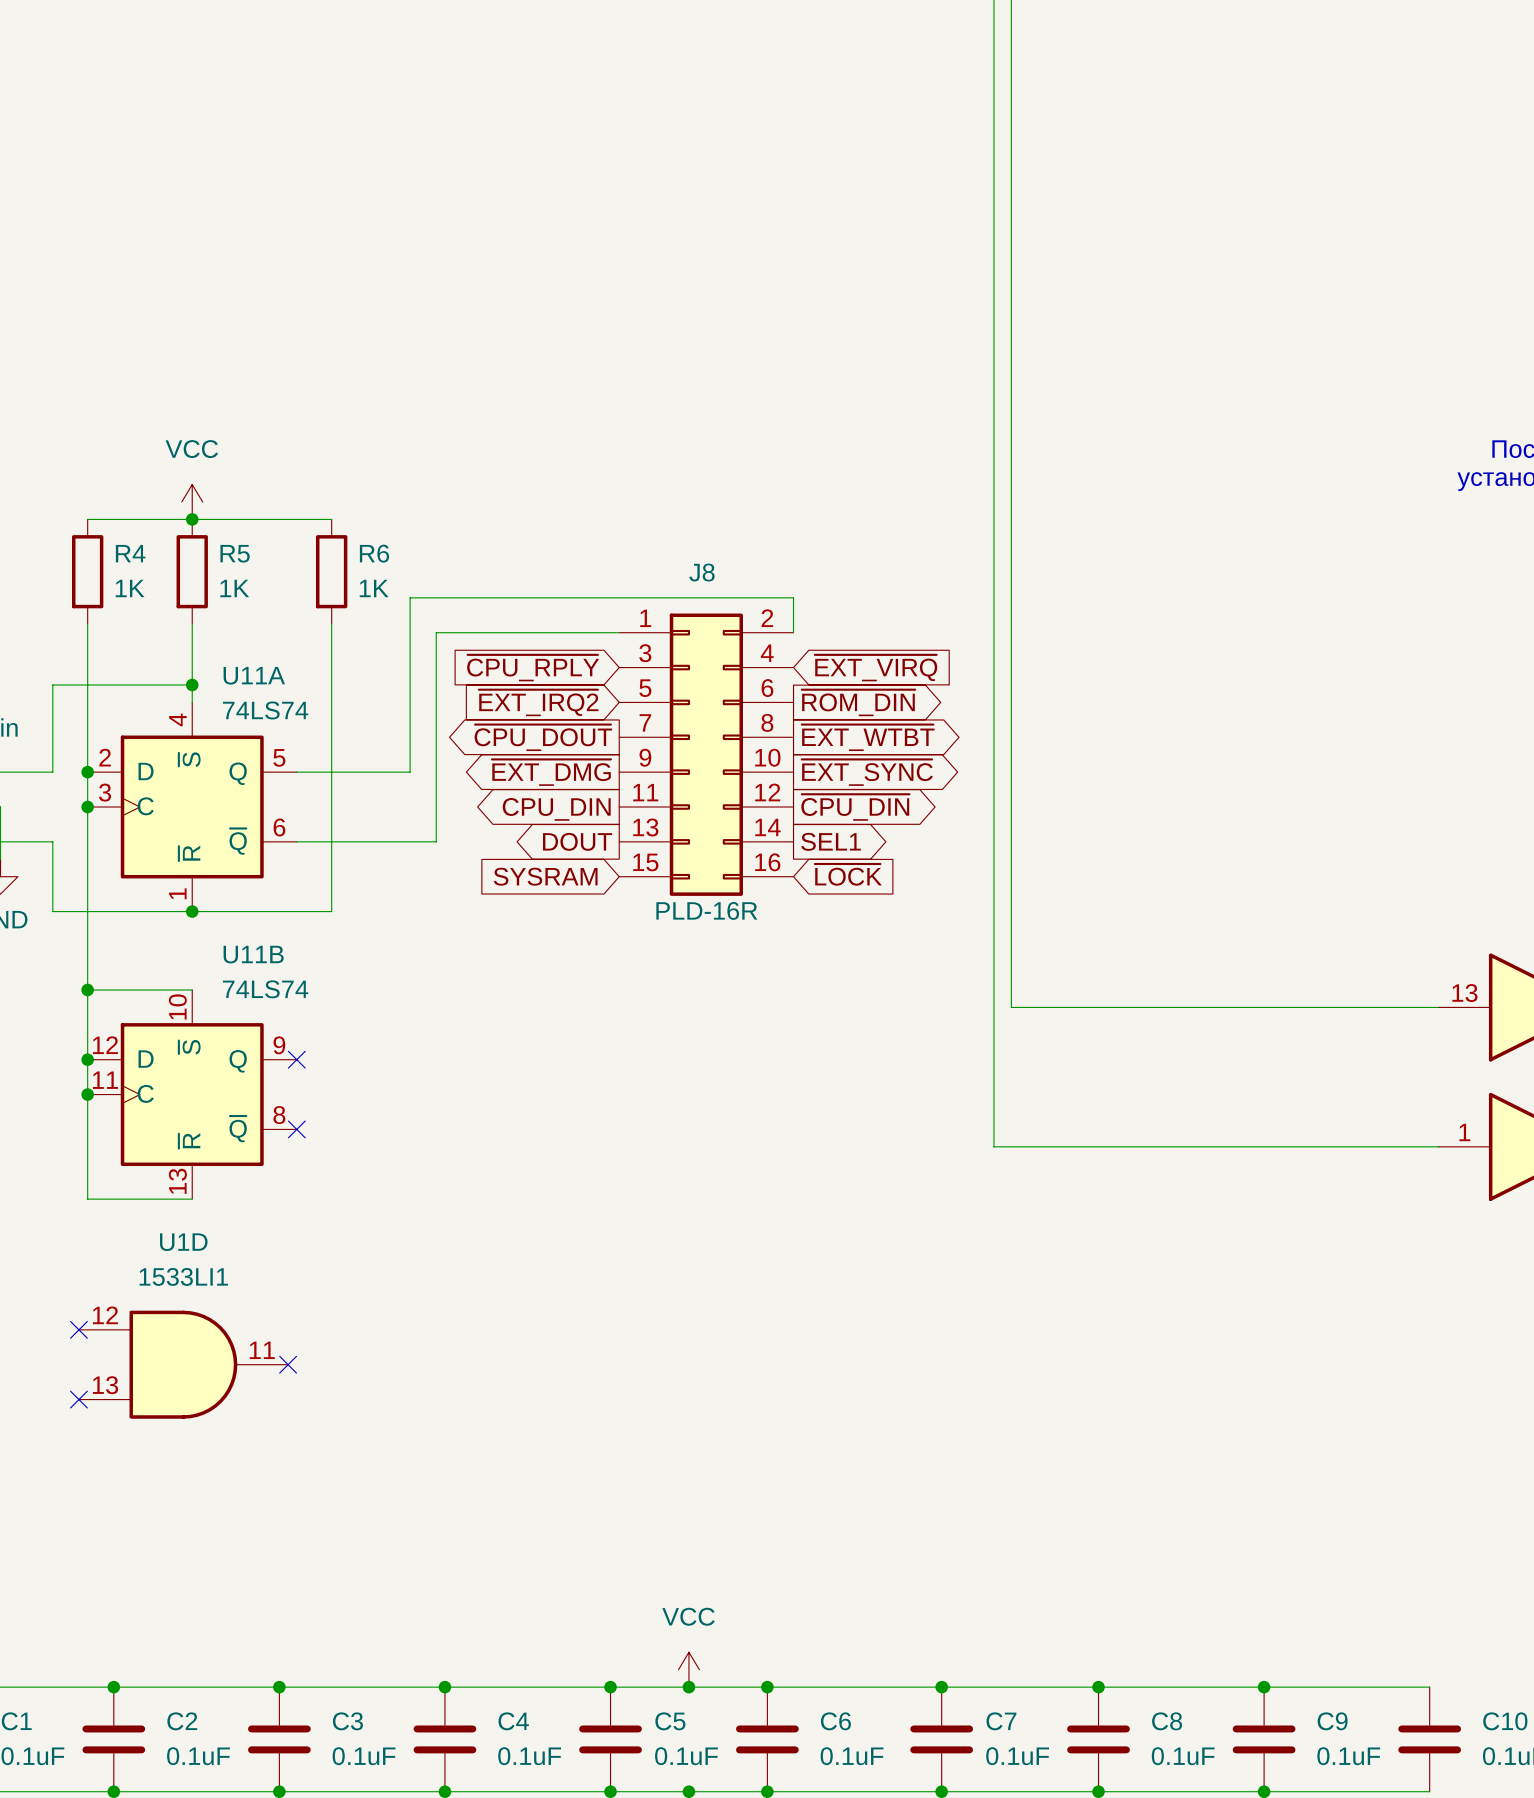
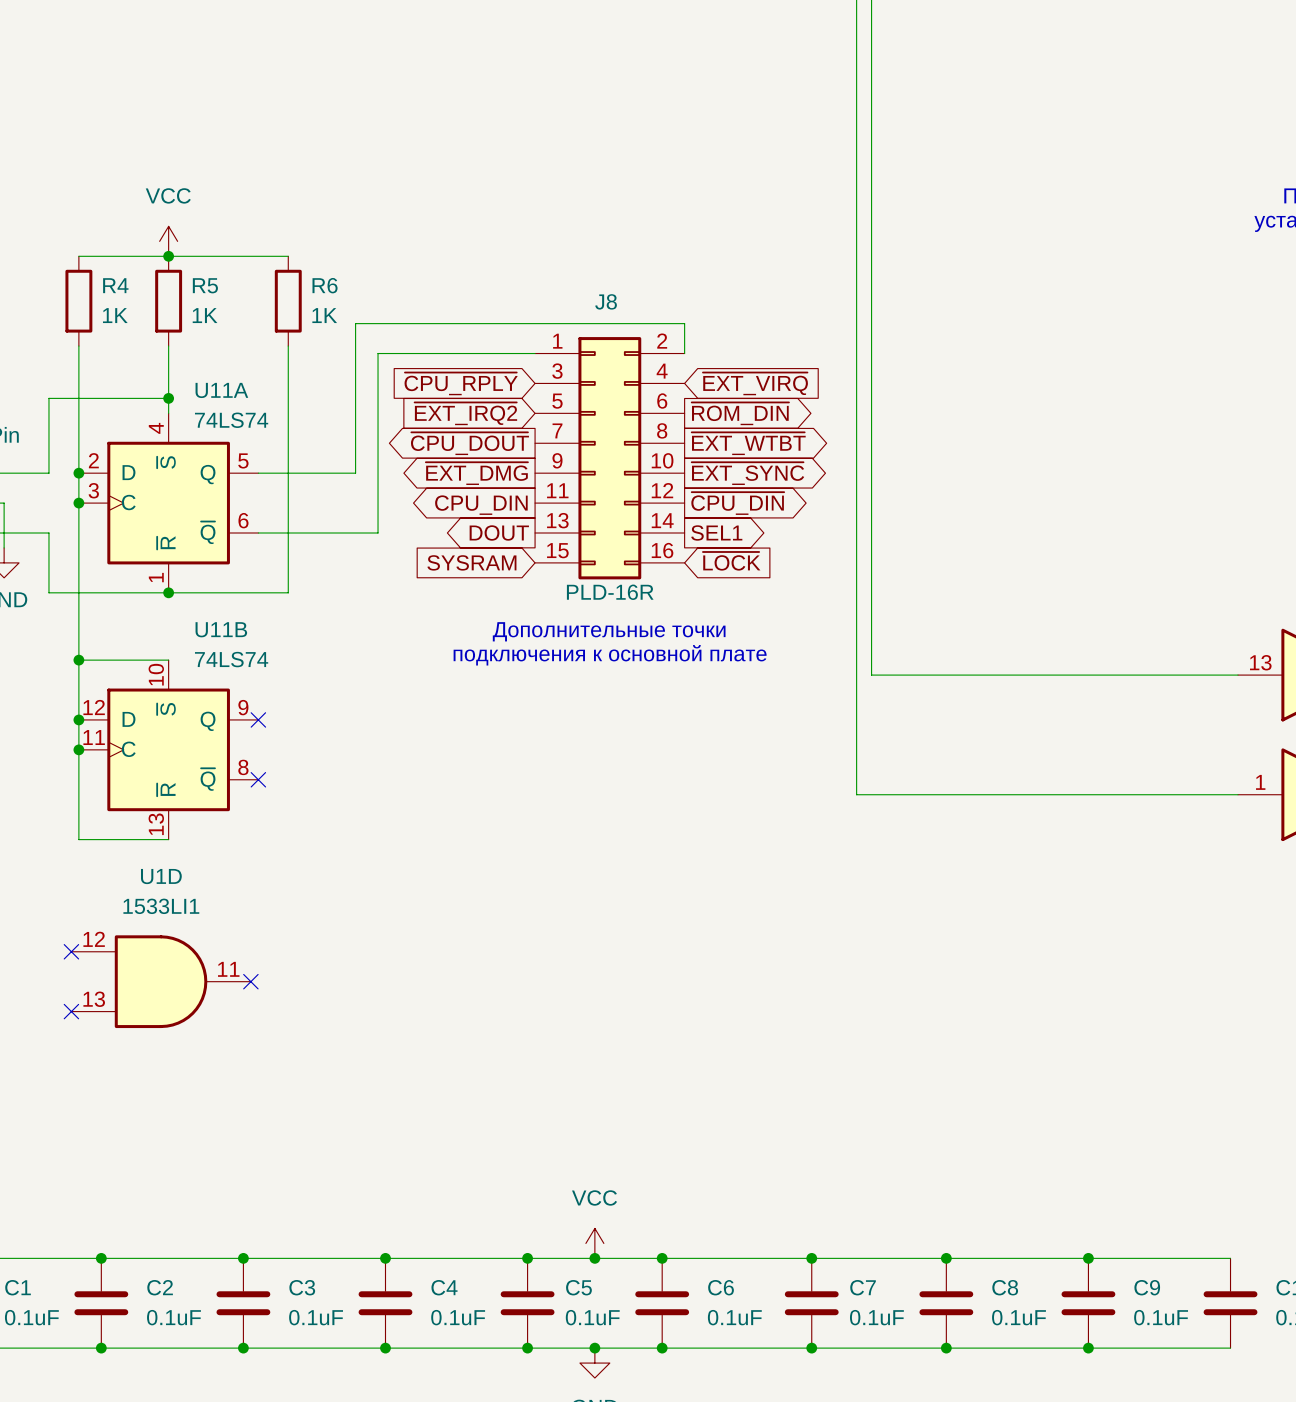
text: none -> Дополнительные точки (609, 631)
text: none -> подключения к основной плате (610, 655)

